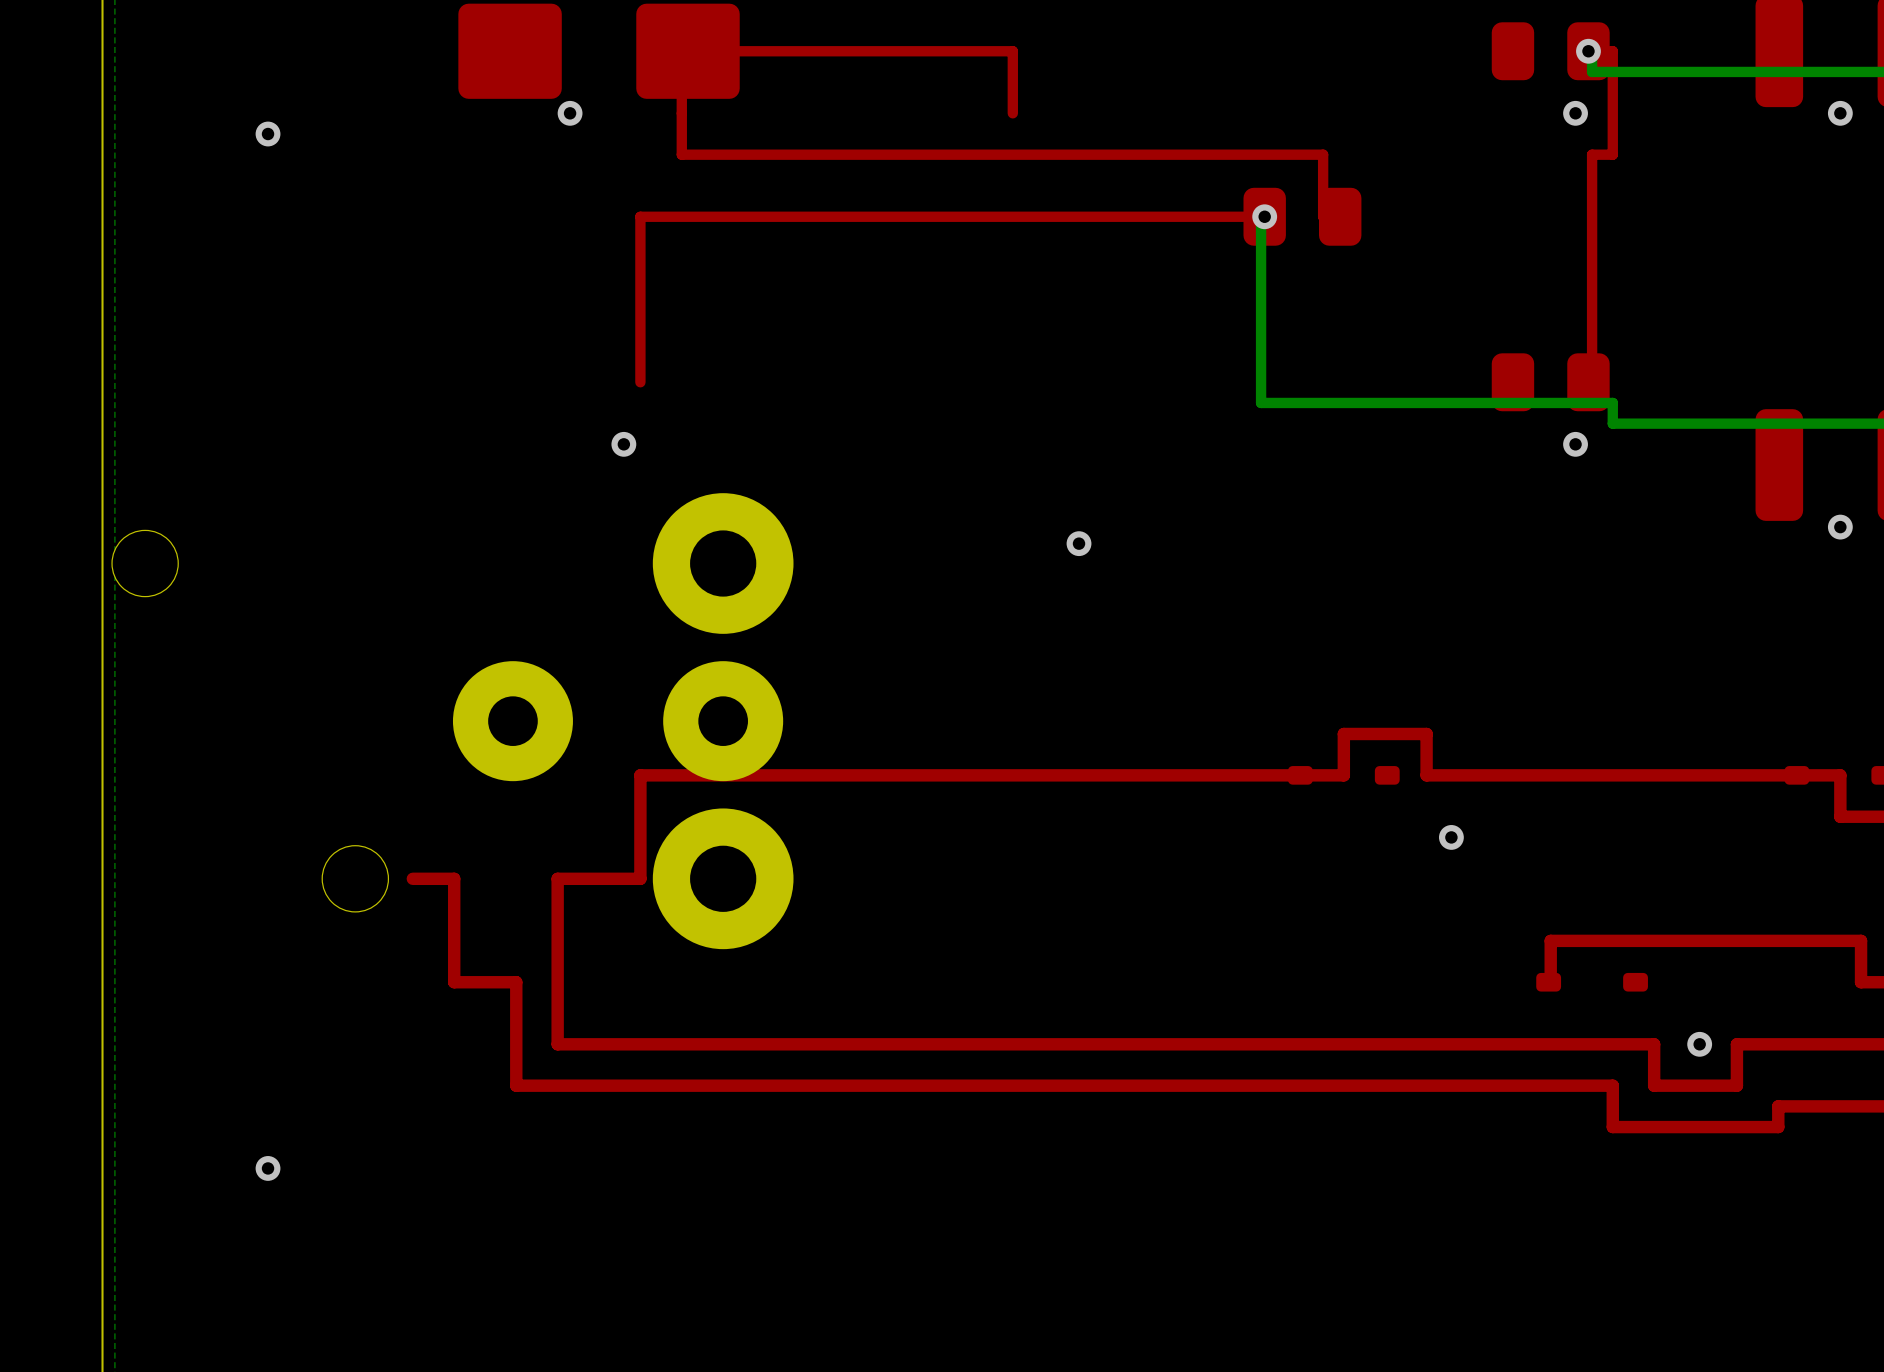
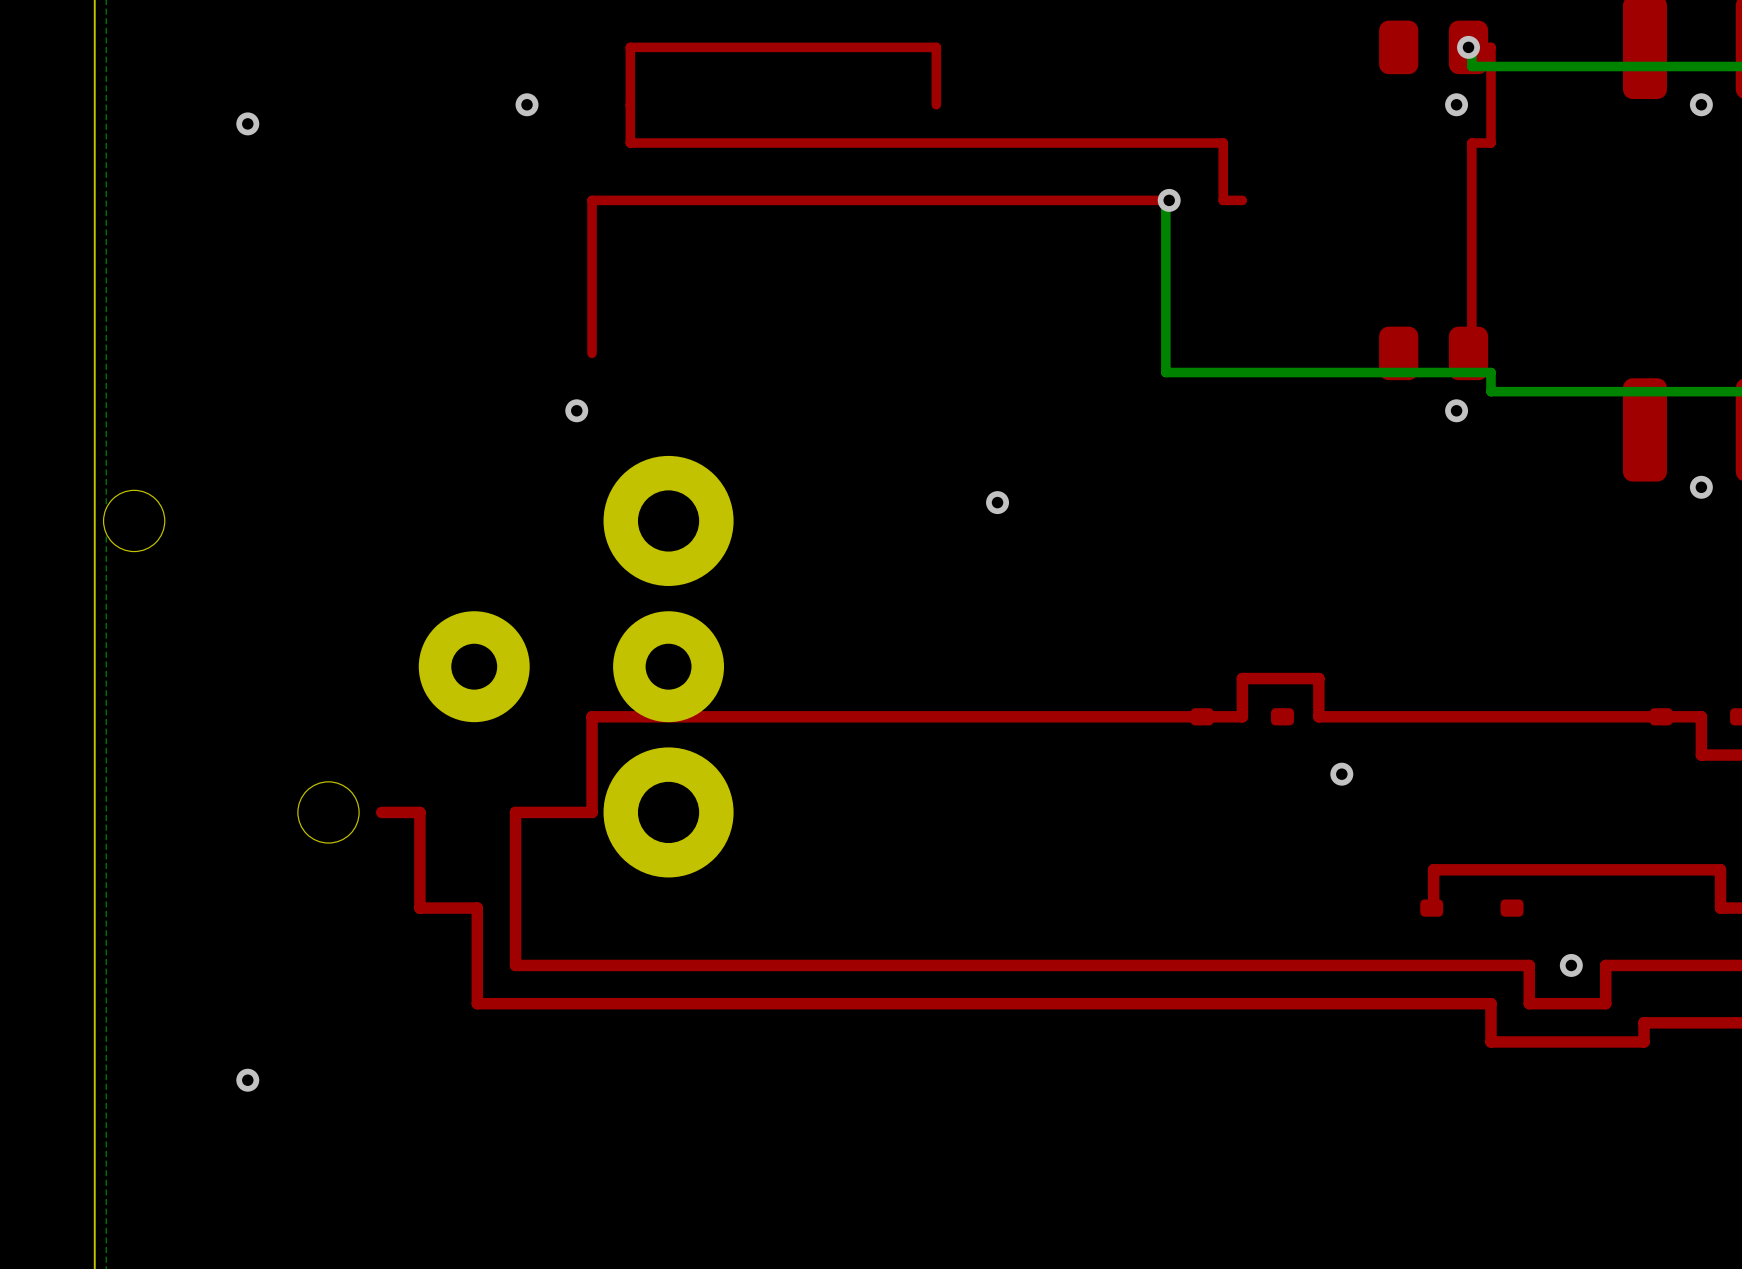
part: (599, 51) -> none
part: (1302, 216) -> none

